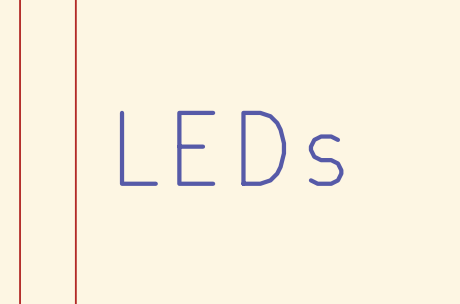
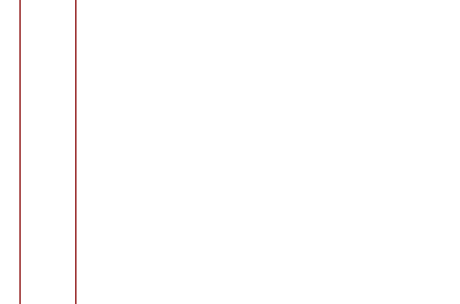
text: LEDs (231, 148) -> none

